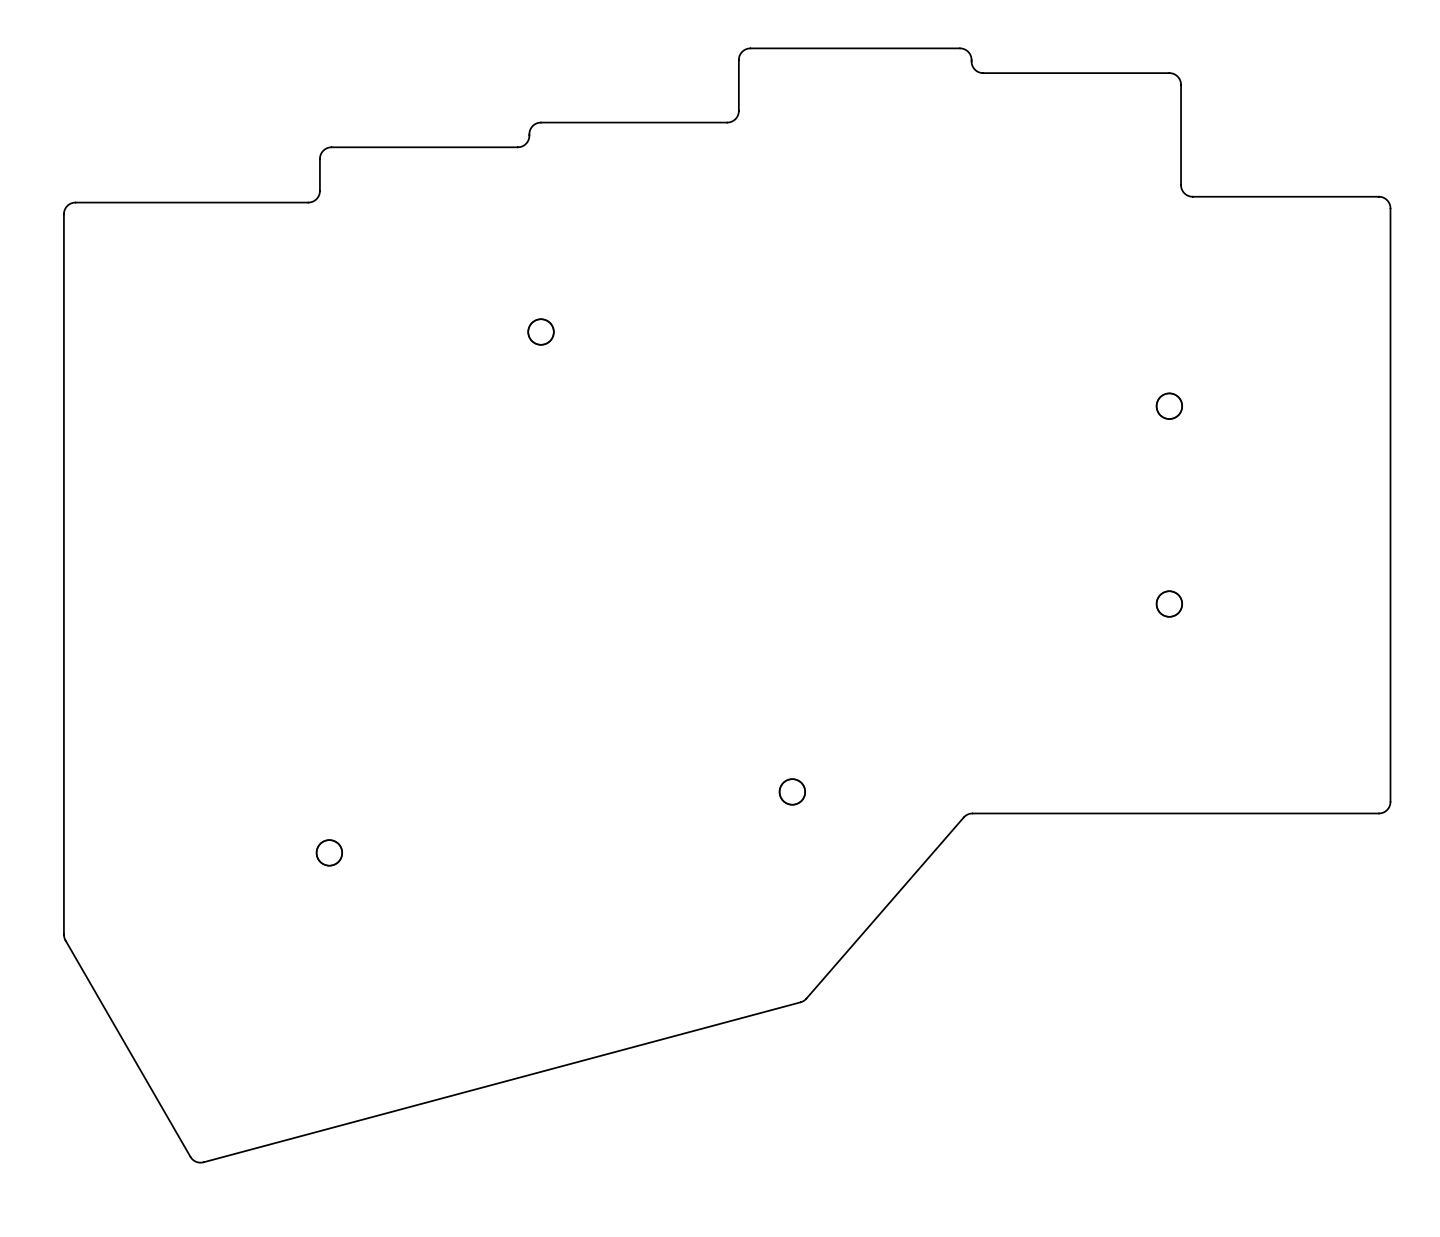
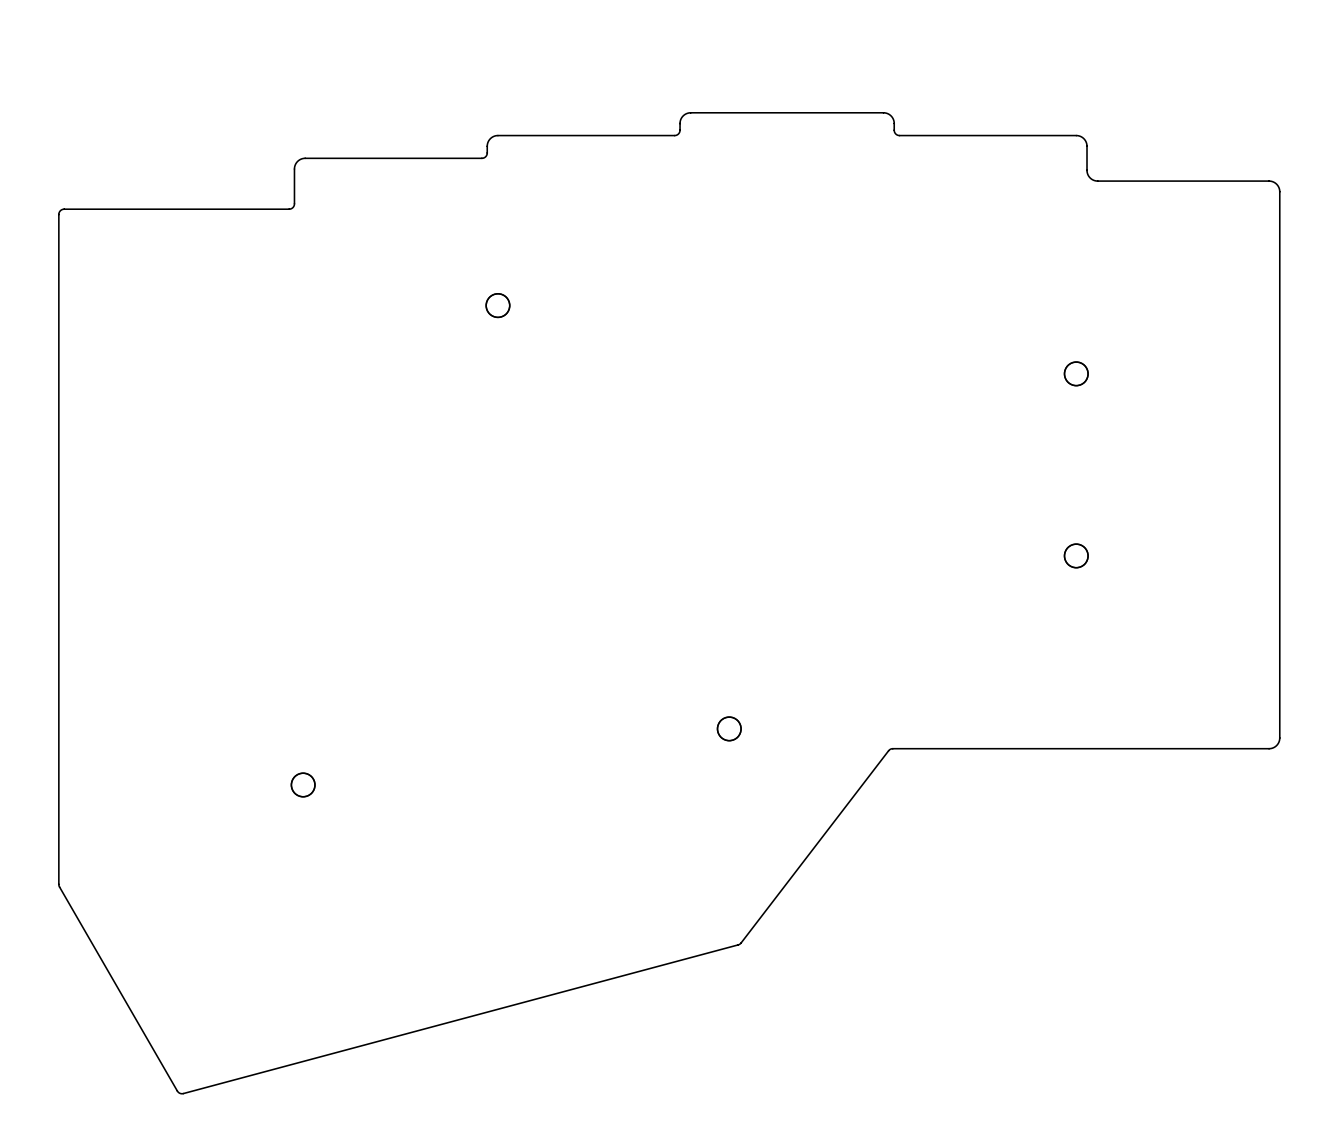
board edge: (1181, 158) (1180, 83) (1178, 77) (1171, 73) (981, 73) (973, 67) (969, 52) (961, 48) (750, 48) (743, 50) (739, 57) (738, 112) (736, 118) (731, 121) (539, 122) (531, 126) (527, 141) (519, 147) (330, 147) (324, 149) (320, 156) (319, 183) -> (1087, 146) (1083, 138) (1077, 135) (898, 135) (894, 131) (892, 117) (884, 112) (690, 112) (681, 117) (679, 131) (675, 135) (496, 135) (488, 140) (486, 154) (482, 158) (303, 158) (297, 161) (294, 169)
board edge: (319, 190) (316, 199) (308, 202) (74, 202) (68, 205) (64, 210) (63, 233) -> (294, 175) (294, 204) (289, 209) (64, 209) (60, 210) (58, 214)
board edge: (972, 813) (963, 817) (802, 1001) (202, 1162) (196, 1161) (190, 1156) (65, 940) (63, 934) -> (895, 748) (888, 750) (739, 944) (182, 1093) (177, 1091) (59, 887) (58, 860)

